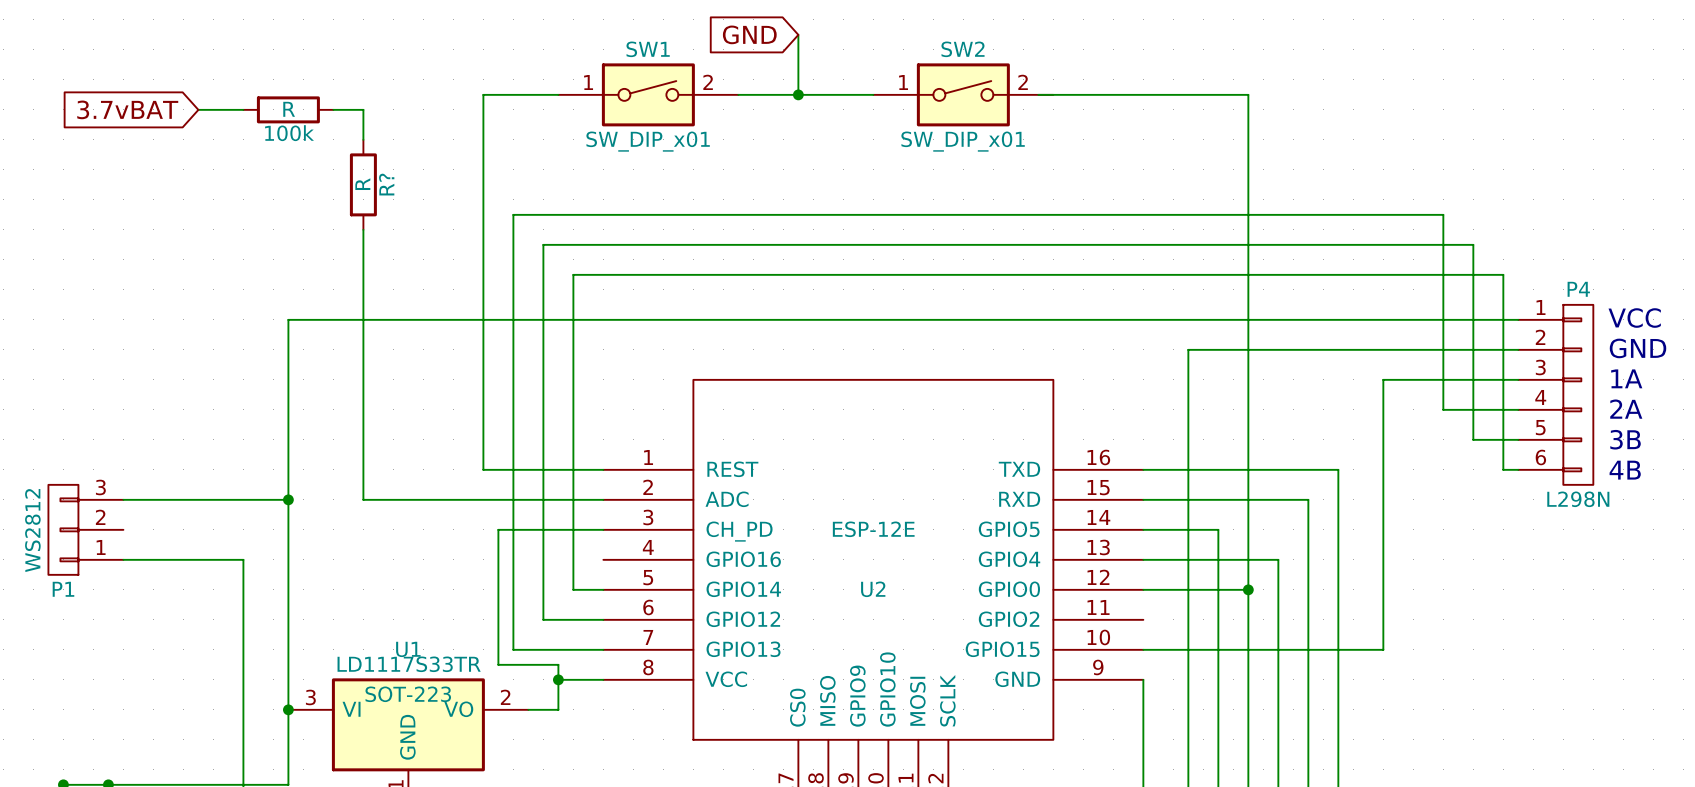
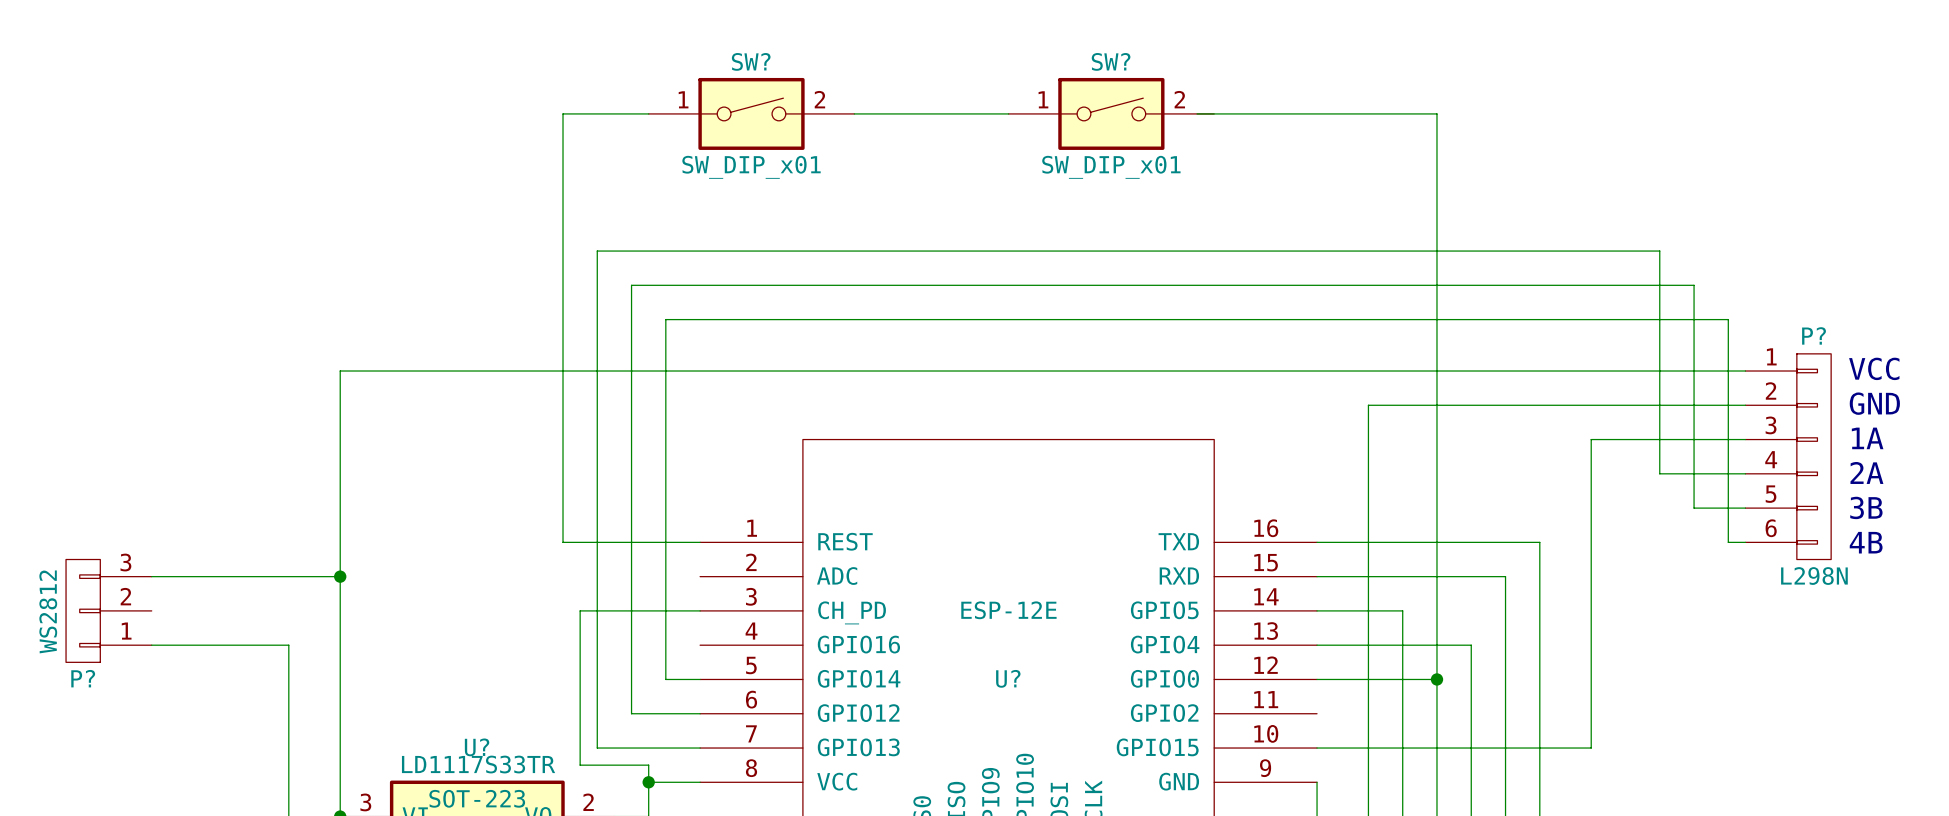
global label: GND (749, 34) -> none
wire: (798, 34) (798, 94) -> none
SW1 name: SW1 (648, 49) -> SW? (751, 61)
SW2 name: SW2 (963, 49) -> SW? (1111, 61)
junction: (798, 94) -> none
global label: 3.7vBAT (127, 109) -> none
wire: (198, 109) (243, 109) -> none
100k: R (288, 109) -> none
wire: (333, 109) (363, 109) (363, 139) -> none
R?: R (363, 184) -> none
wire: (363, 229) (363, 499) (603, 499) -> none
P4 name: P4 (1578, 289) -> P? (1814, 335)
P1 name: P1 (63, 589) -> P? (83, 678)
U2 name: U2 (873, 589) -> U? (1008, 678)
U1 name: U1 (408, 649) -> U? (477, 747)

